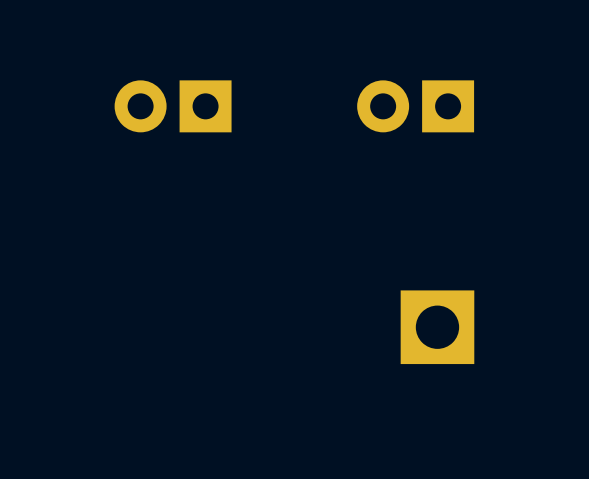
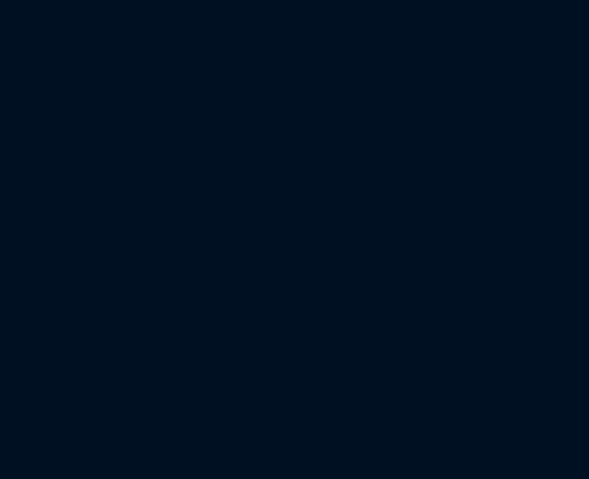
part: (173, 106) -> none
part: (415, 106) -> none
part: (437, 327) -> none

